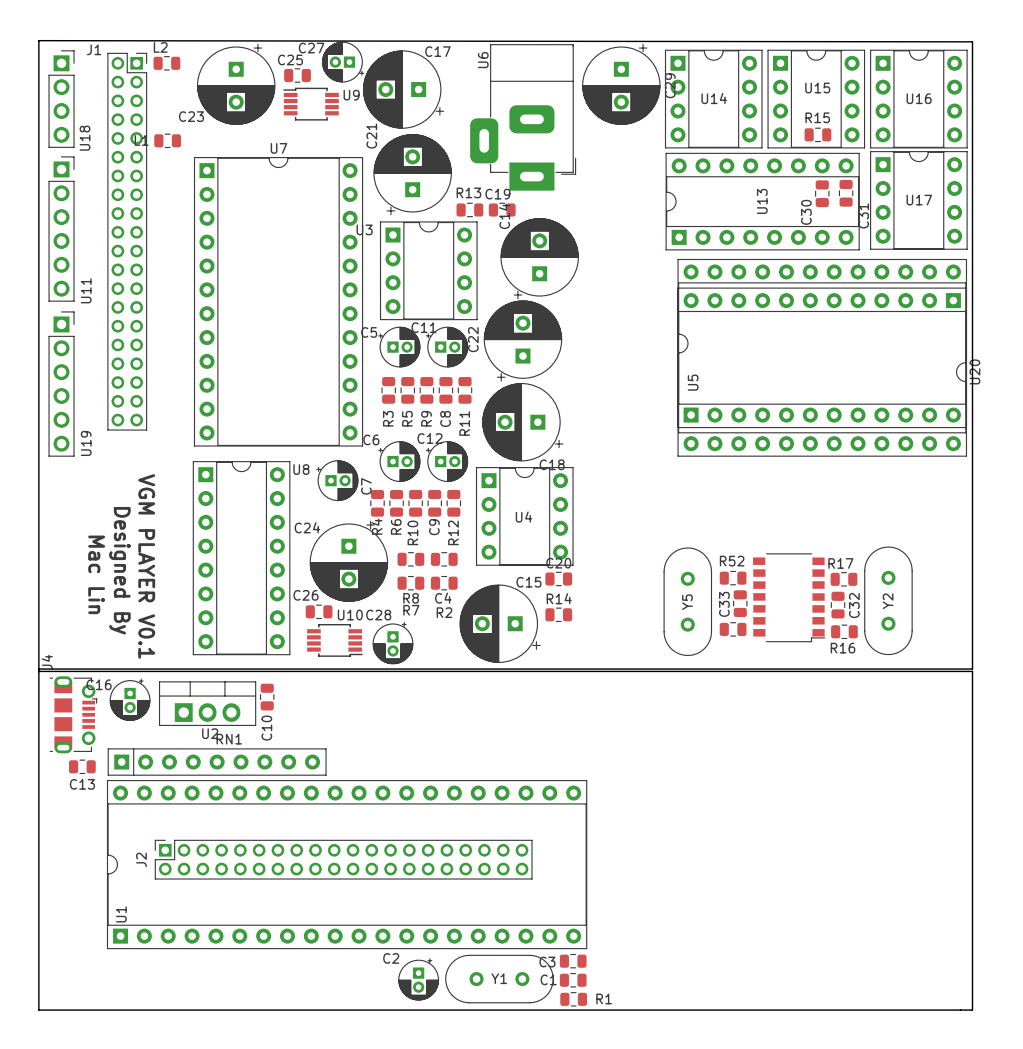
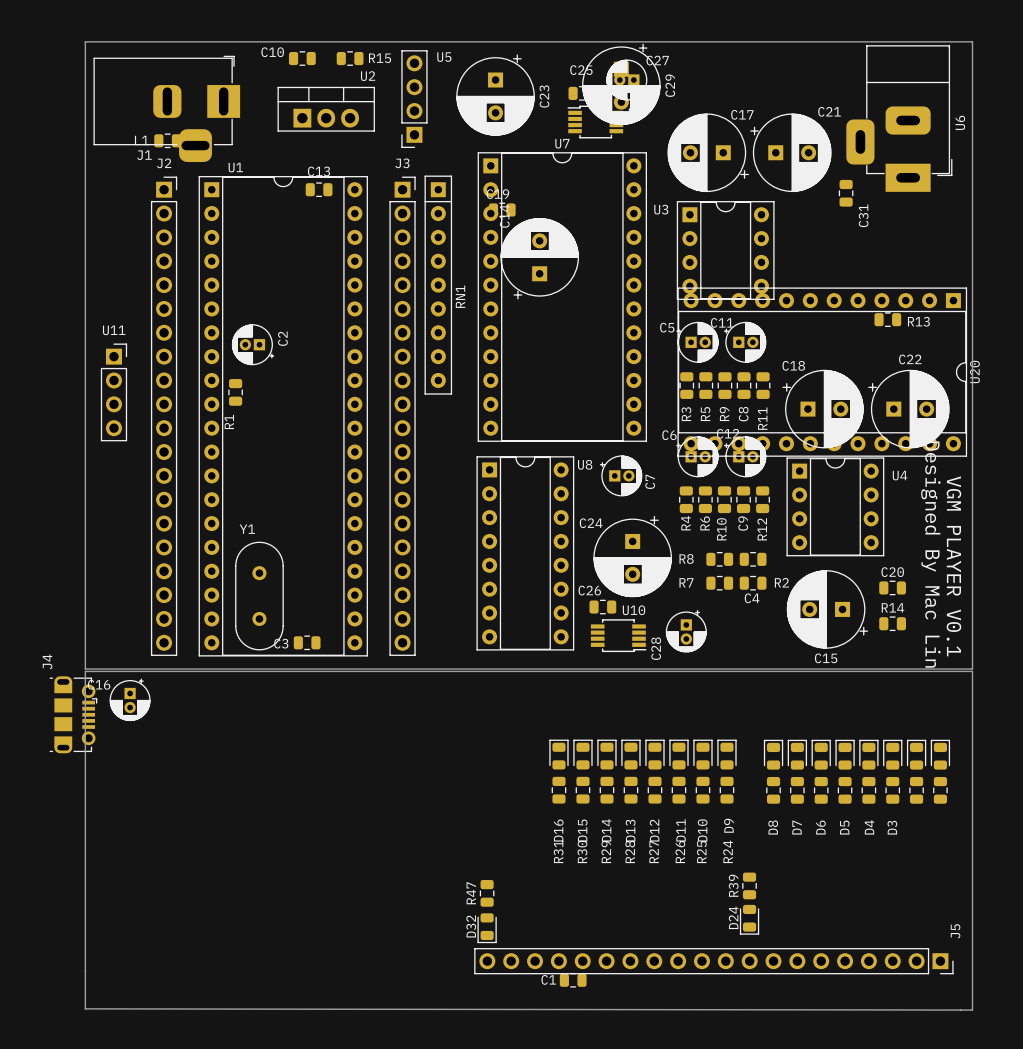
board edge: (972, 41) (38, 40) (38, 1010) (960, 1010) -> (972, 41) (85, 41) (85, 669)
C27 name position: C27 (311, 48) -> C27 (657, 60)
J1 name position: J1 (94, 49) -> J1 (144, 155)
J1 footprint: [107, 52, 148, 431] -> [93, 55, 241, 163]
C25 name position: C25 (290, 59) -> C25 (581, 70)
U6 name position: U6 (483, 60) -> U6 (960, 122)
C27 position: (343, 62) -> (627, 80)
L2: (166, 63) -> none
C25 position: (297, 75) -> (581, 93)
C23 position: (236, 84) -> (495, 95)
C17 position: (403, 89) -> (708, 152)
U18: (61, 99) -> none
U14: (713, 99) -> none
U15: (816, 99) -> none
U16: (918, 99) -> none
U9 position: (310, 104) -> (595, 122)
C23 name rotation: 0° (191, 116) -> 90° counterclockwise (544, 96)
C23 name position: C23 (191, 116) -> C23 (544, 96)
U6 position: (523, 117) -> (899, 118)
R15 name position: R15 (817, 117) -> R15 (380, 58)
R15 position: (817, 134) -> (350, 58)
U11 footprint: [48, 156, 75, 302] -> [100, 343, 128, 442]
C21 rotation: 0° (412, 174) -> 90° clockwise (790, 152)
C21 position: (412, 174) -> (790, 152)
R13 name position: R13 (468, 192) -> R13 (918, 321)
C30: (822, 193) -> none
U17: (918, 200) -> none
U13: (762, 201) -> none
R13 position: (469, 209) -> (887, 319)
U5 footprint: [677, 258, 968, 429] -> [401, 50, 428, 148]
U3 position: (428, 270) -> (725, 250)
U11 name position: U11 (86, 290) -> U11 (114, 330)
U7 position: (278, 301) -> (562, 297)
C22 rotation: 0° (522, 340) -> 90° clockwise (908, 409)
C22 position: (522, 340) -> (908, 409)
C5 position: (399, 347) -> (697, 342)
C11 position: (447, 347) -> (745, 342)
U5 name position: U5 (693, 382) -> U5 (444, 57)
U19: (61, 384) -> none
R3 position: (388, 390) -> (686, 385)
R5 position: (407, 390) -> (705, 385)
R9 position: (426, 390) -> (724, 385)
C8 position: (445, 390) -> (744, 385)
R11 position: (465, 390) -> (763, 385)
J3: none -> (402, 416)
C18 rotation: 0° (522, 422) -> 180° (823, 409)
C18 position: (522, 422) -> (823, 409)
C6 position: (399, 461) -> (697, 456)
C12 position: (447, 461) -> (745, 456)
C7 position: (337, 480) -> (621, 475)
R4 position: (377, 503) -> (686, 499)
R6 position: (396, 503) -> (705, 499)
R10 position: (415, 503) -> (724, 499)
C9 position: (434, 503) -> (743, 499)
R12 position: (453, 503) -> (762, 499)
U4 position: (524, 516) -> (835, 506)
U4 name position: U4 (524, 517) -> U4 (900, 475)
text: none -> Designed By Mac Lin (930, 554)
U8 position: (241, 558) -> (525, 553)
R8 position: (410, 559) -> (719, 559)
C4 position: (444, 559) -> (753, 559)
C24 position: (348, 561) -> (632, 556)
text: none -> VGM PLAYER V0.1 (953, 566)
text: VGM PLAYER V0.1 (146, 566) -> none
text: Designed By (119, 570) -> none
text: Mac Lin (96, 574) -> none
R52: (733, 578) -> none
C20 position: (558, 579) -> (892, 587)
R17: (843, 579) -> none
C15 name position: C15 (528, 582) -> C15 (826, 658)
R7 position: (410, 583) -> (719, 583)
R2 position: (444, 583) -> (753, 583)
part: (789, 597) -> none
R8 name position: R8 (411, 598) -> R8 (686, 558)
Y2: (888, 600) -> none
Y5: (687, 601) -> none
C33: (740, 603) -> none
C32: (838, 605) -> none
R7 name position: R7 (411, 610) -> R7 (686, 582)
C26 position: (319, 611) -> (602, 607)
R2 name position: R2 (444, 612) -> R2 (781, 582)
R14 position: (558, 614) -> (892, 623)
C28 name rotation: 0° (378, 615) -> 90° counterclockwise (656, 648)
C28 name position: C28 (378, 615) -> C28 (656, 648)
C15 position: (500, 623) -> (827, 609)
part: (733, 629) -> none
R16: (844, 631) -> none
U10 position: (334, 640) -> (618, 635)
C28 position: (393, 643) -> (686, 631)
board edge: (38, 669) (85, 669) -> none
board edge: (38, 671) (85, 671) -> (960, 1010) (85, 1008) (85, 671)
C10 rotation: 0° (267, 697) -> 90° clockwise (302, 58)
C10 position: (267, 697) -> (302, 58)
U2 position: (207, 703) -> (326, 109)
U2 name position: U2 (210, 733) -> U2 (368, 76)
D16: none -> (558, 754)
D15: none -> (582, 754)
D14: none -> (606, 754)
D13: none -> (630, 754)
D12: none -> (654, 754)
D11: none -> (678, 754)
D10: none -> (702, 754)
D9: none -> (726, 754)
D8: none -> (773, 754)
D7: none -> (797, 754)
D6: none -> (821, 754)
D5: none -> (845, 754)
D4: none -> (868, 754)
D3: none -> (892, 754)
part: none -> (916, 754)
part: none -> (940, 754)
RN1 rotation: 0° (217, 762) -> 90° clockwise (438, 285)
RN1 position: (217, 762) -> (438, 285)
C13 position: (82, 766) -> (319, 189)
C13 name position: C13 (82, 784) -> C13 (318, 171)
R31: none -> (558, 790)
R30: none -> (582, 790)
R29: none -> (606, 790)
R28: none -> (630, 790)
R27: none -> (654, 790)
R26: none -> (678, 790)
R25: none -> (702, 790)
R24: none -> (726, 790)
part: none -> (773, 790)
part: none -> (797, 790)
part: none -> (821, 790)
part: none -> (845, 790)
part: none -> (868, 790)
part: none -> (892, 790)
part: none -> (916, 790)
part: none -> (940, 790)
J2 footprint: [154, 839, 533, 880] -> [151, 176, 178, 656]
J2 name position: J2 (141, 859) -> J2 (164, 163)
U1 rotation: 0° (347, 864) -> 90° clockwise (283, 416)
U1 position: (347, 864) -> (283, 416)
R39: none -> (749, 885)
R47: none -> (487, 893)
U1 name position: U1 (121, 914) -> U1 (235, 167)
D24: none -> (749, 919)
D32: none -> (487, 928)
C2 name position: C2 (391, 958) -> C2 (282, 338)
C3 position: (573, 961) -> (307, 642)
J5: none -> (713, 961)
Y1 name position: Y1 (499, 978) -> Y1 (247, 529)
C2 rotation: 0° (418, 979) -> 90° clockwise (253, 344)
C2 position: (418, 979) -> (253, 344)
Y1 rotation: 0° (499, 979) -> 90° clockwise (259, 596)
Y1 position: (499, 979) -> (259, 596)
R1 rotation: 0° (573, 999) -> 90° clockwise (235, 392)
R1 position: (573, 999) -> (235, 392)

